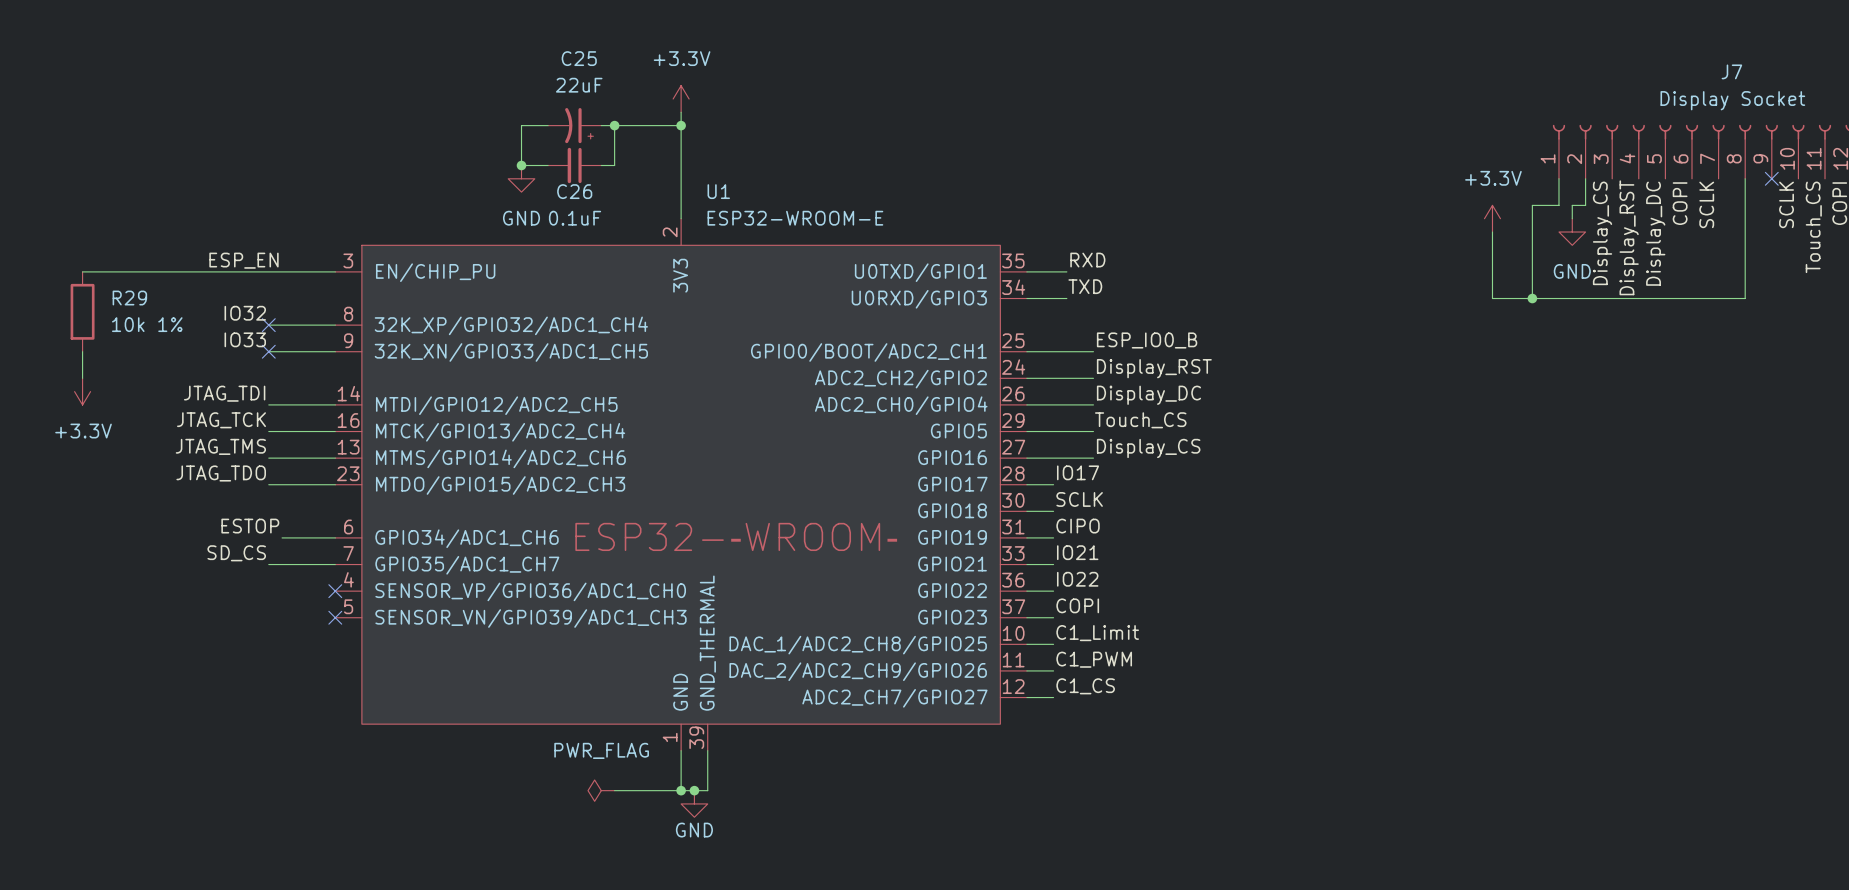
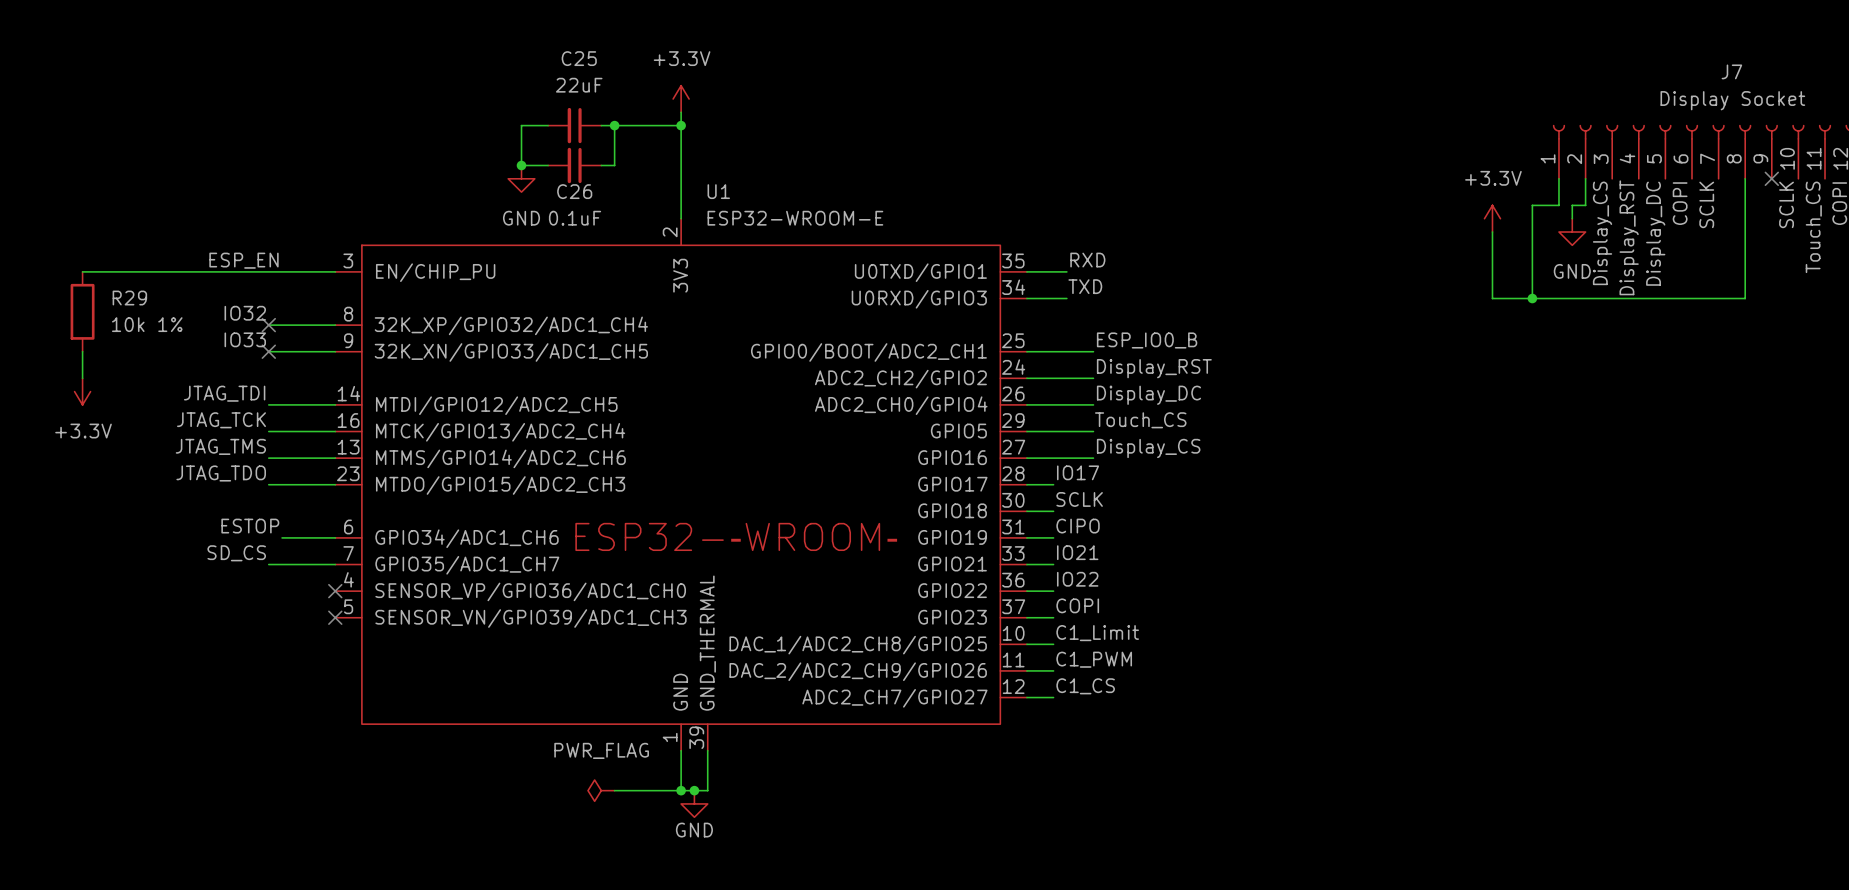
C25 symbol: [548, 108, 602, 144] -> [548, 107, 602, 144]

